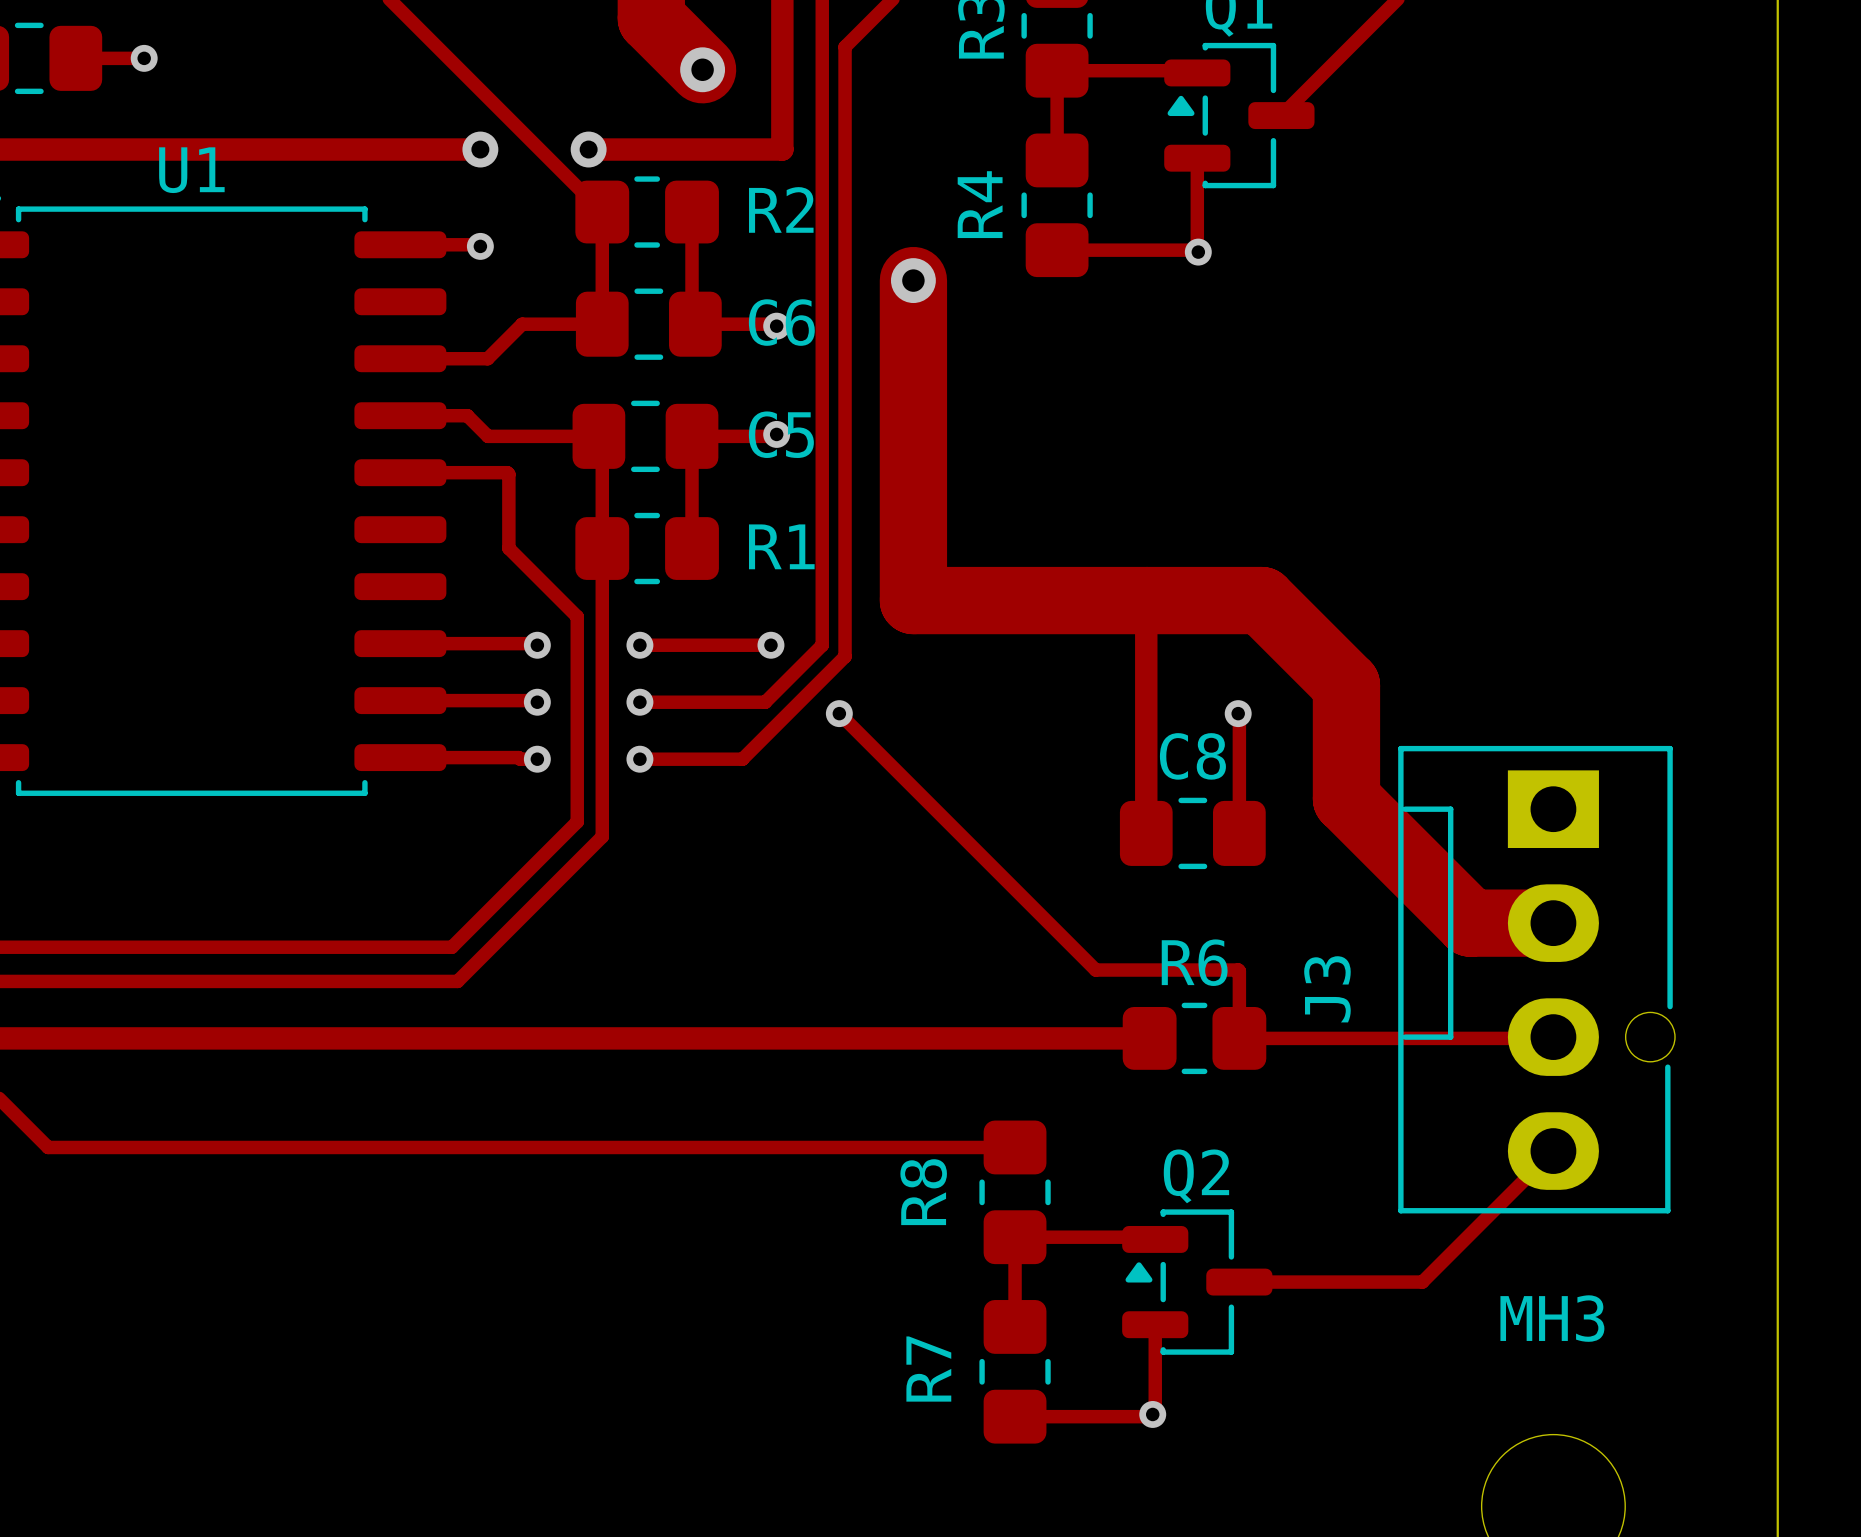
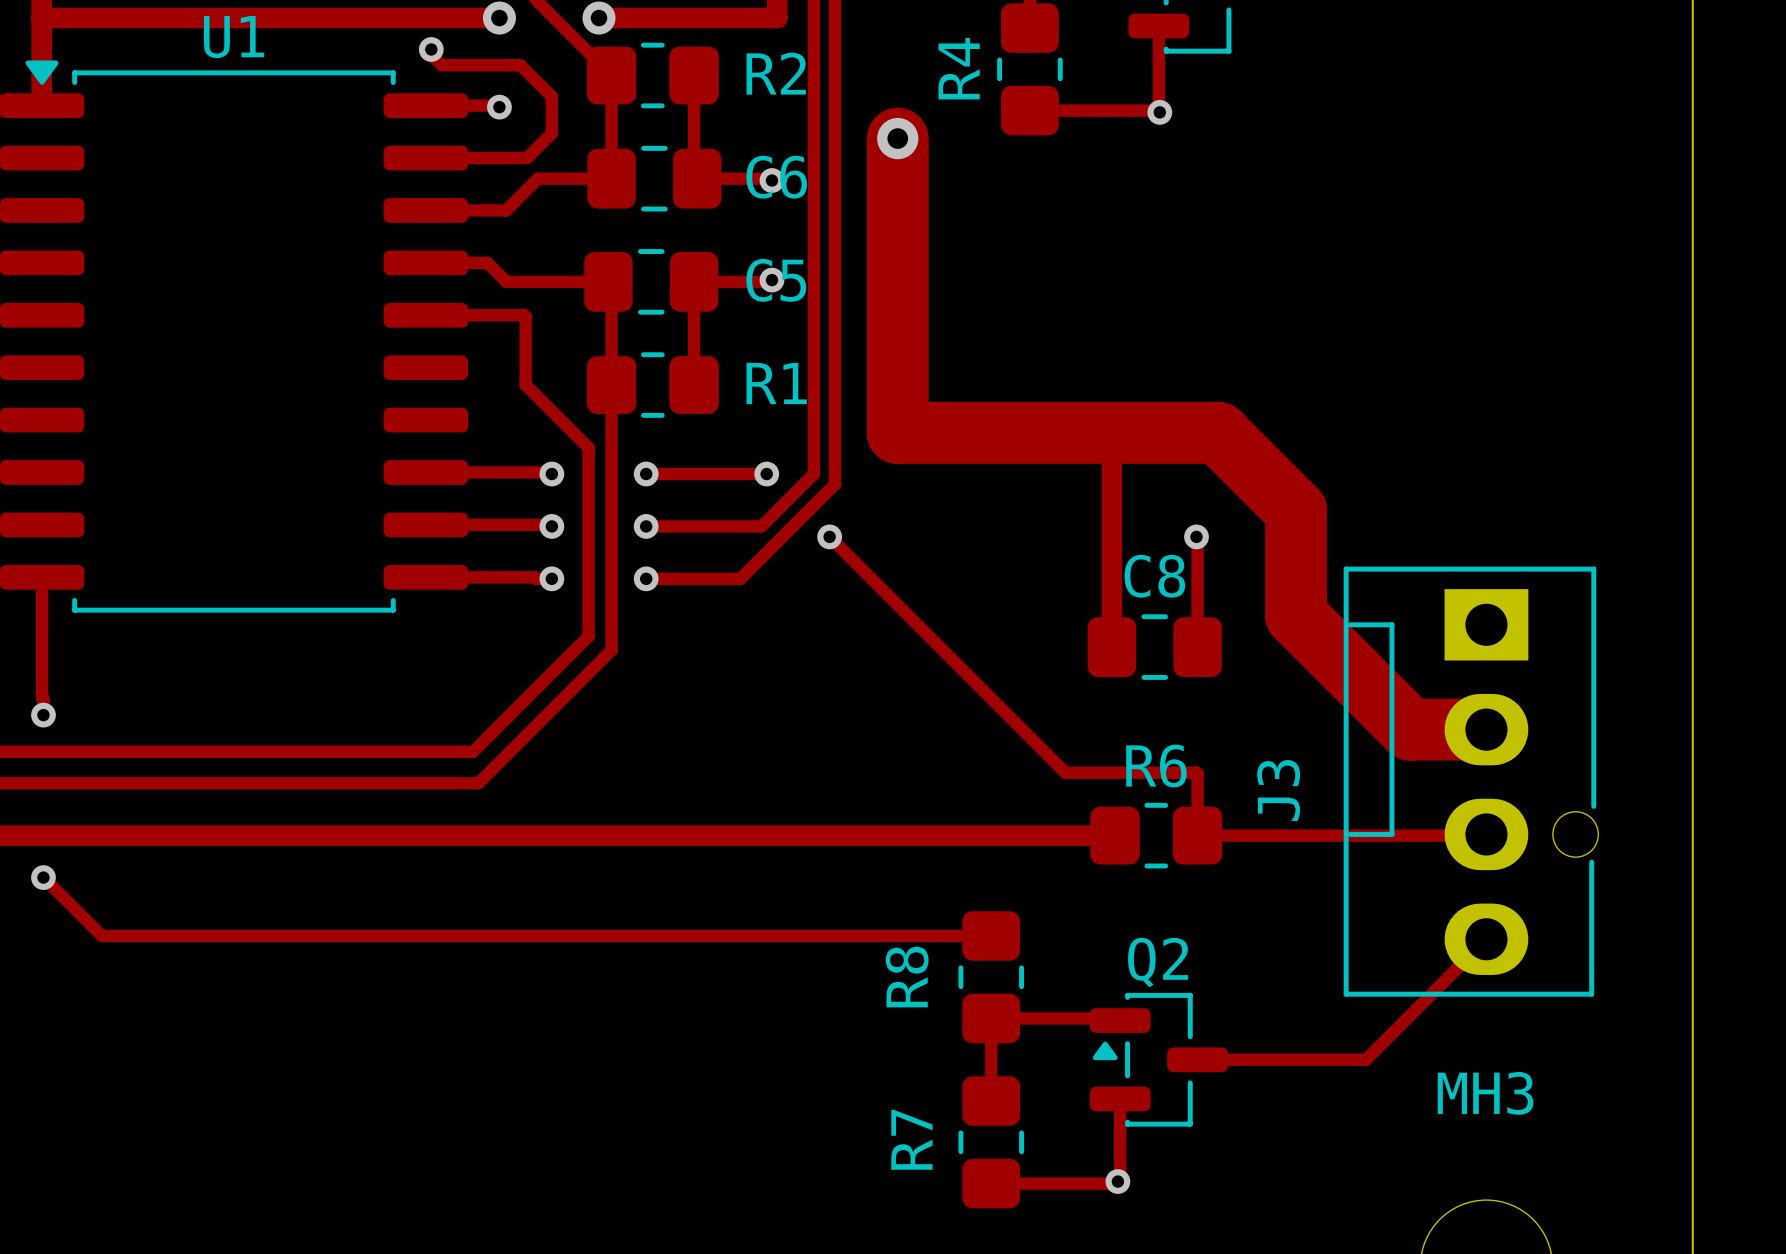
track: none -> (431, 49) (431, 54) (441, 65) (520, 65) (551, 96) (551, 133) (527, 158) (425, 158)
via: none -> (431, 49)

